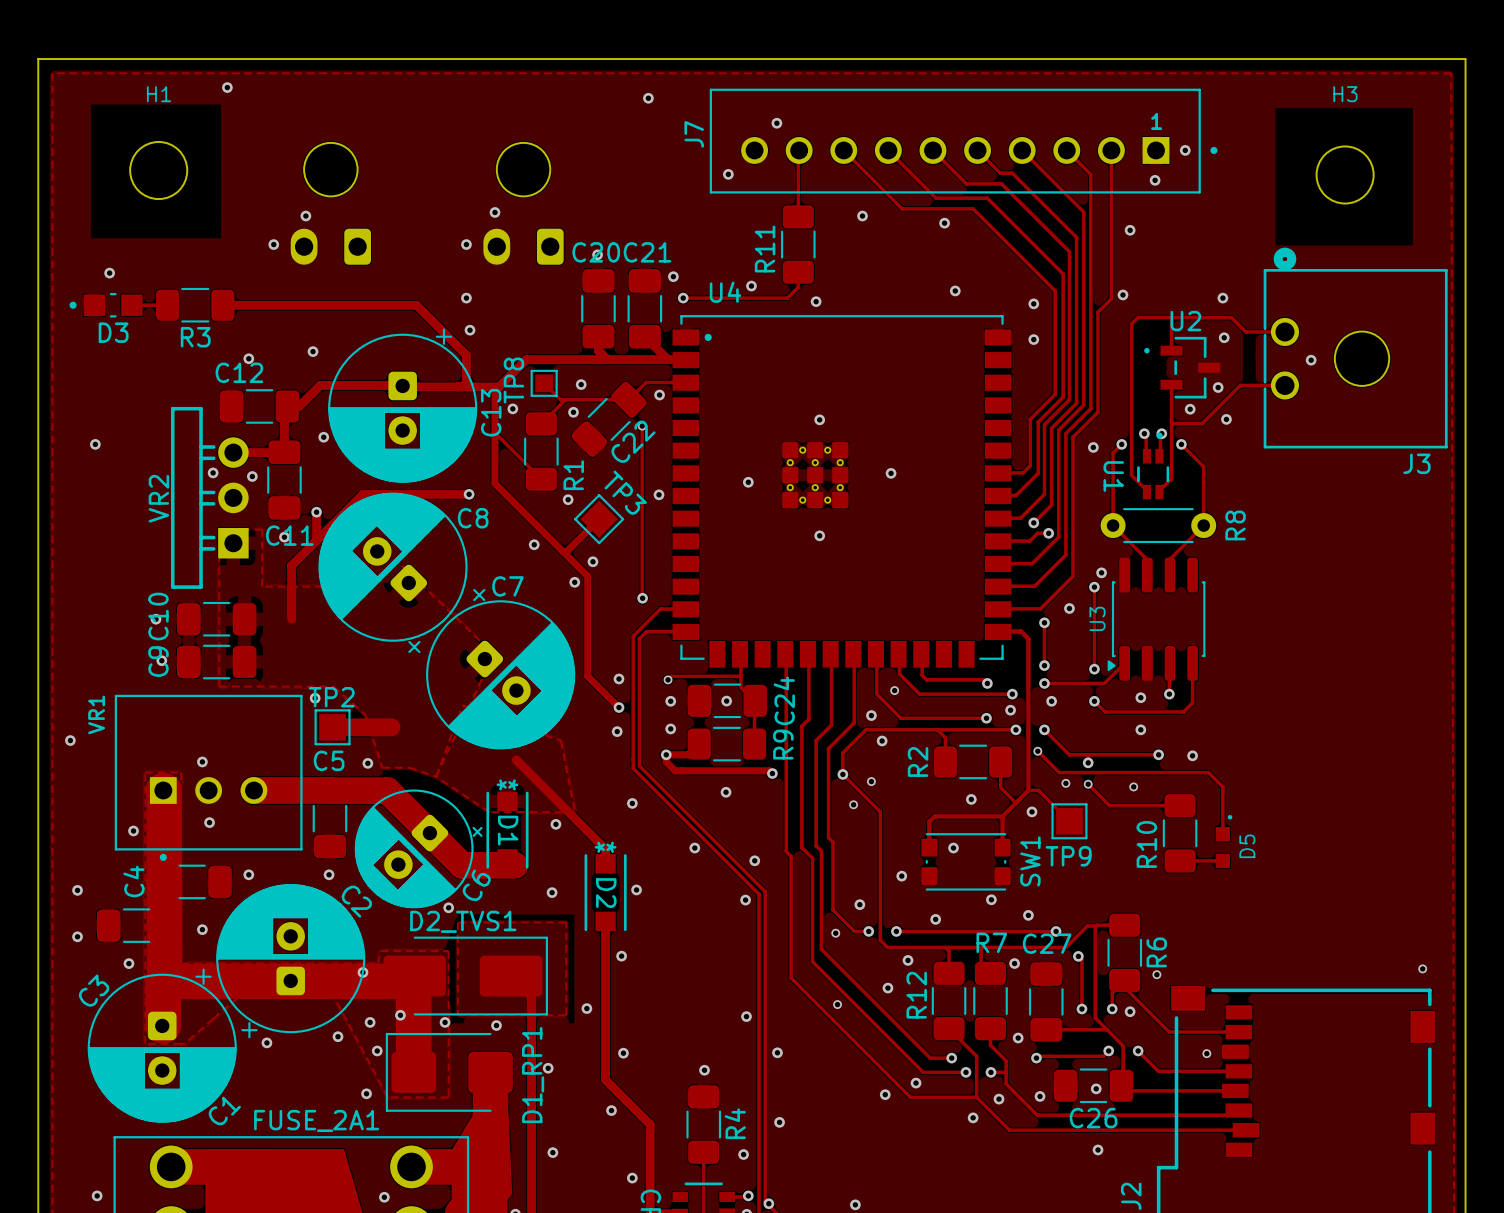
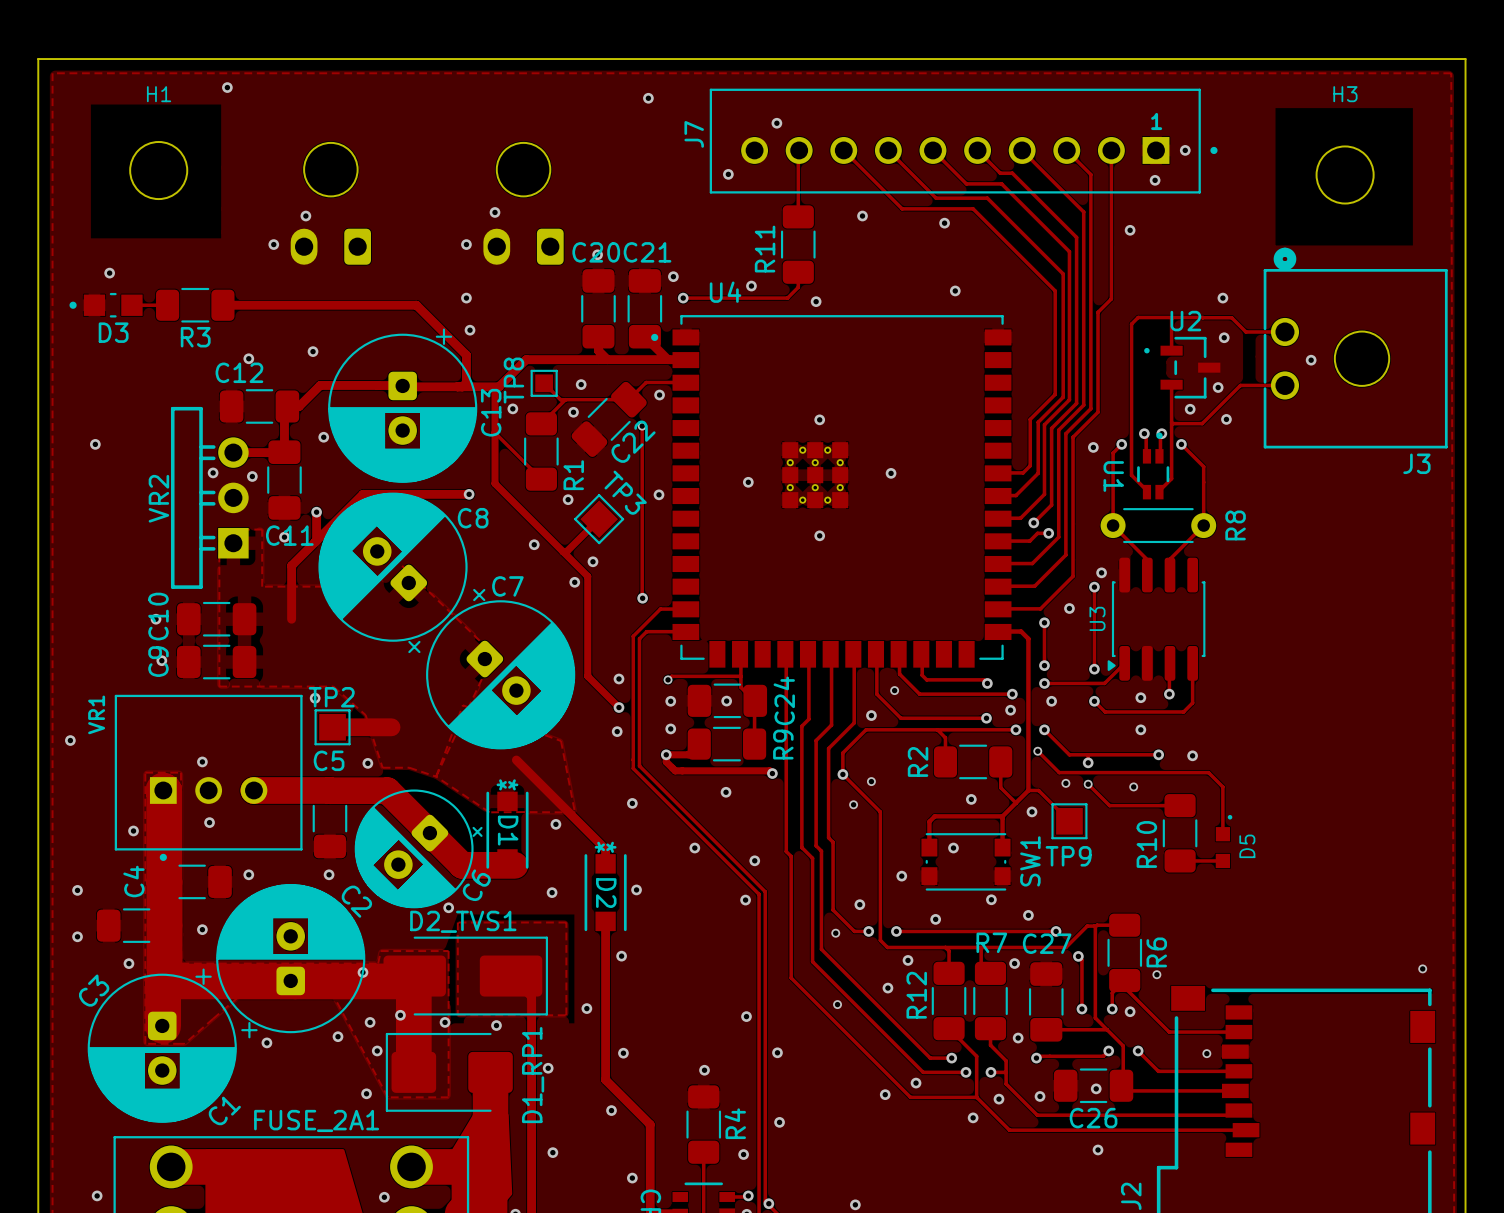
via: (1122, 294) -> none
via: (1033, 303) -> none
U4 footprint: [672, 315, 1012, 668] -> [651, 315, 1012, 668]
via: (1033, 339) -> none
via: (882, 740) -> none

